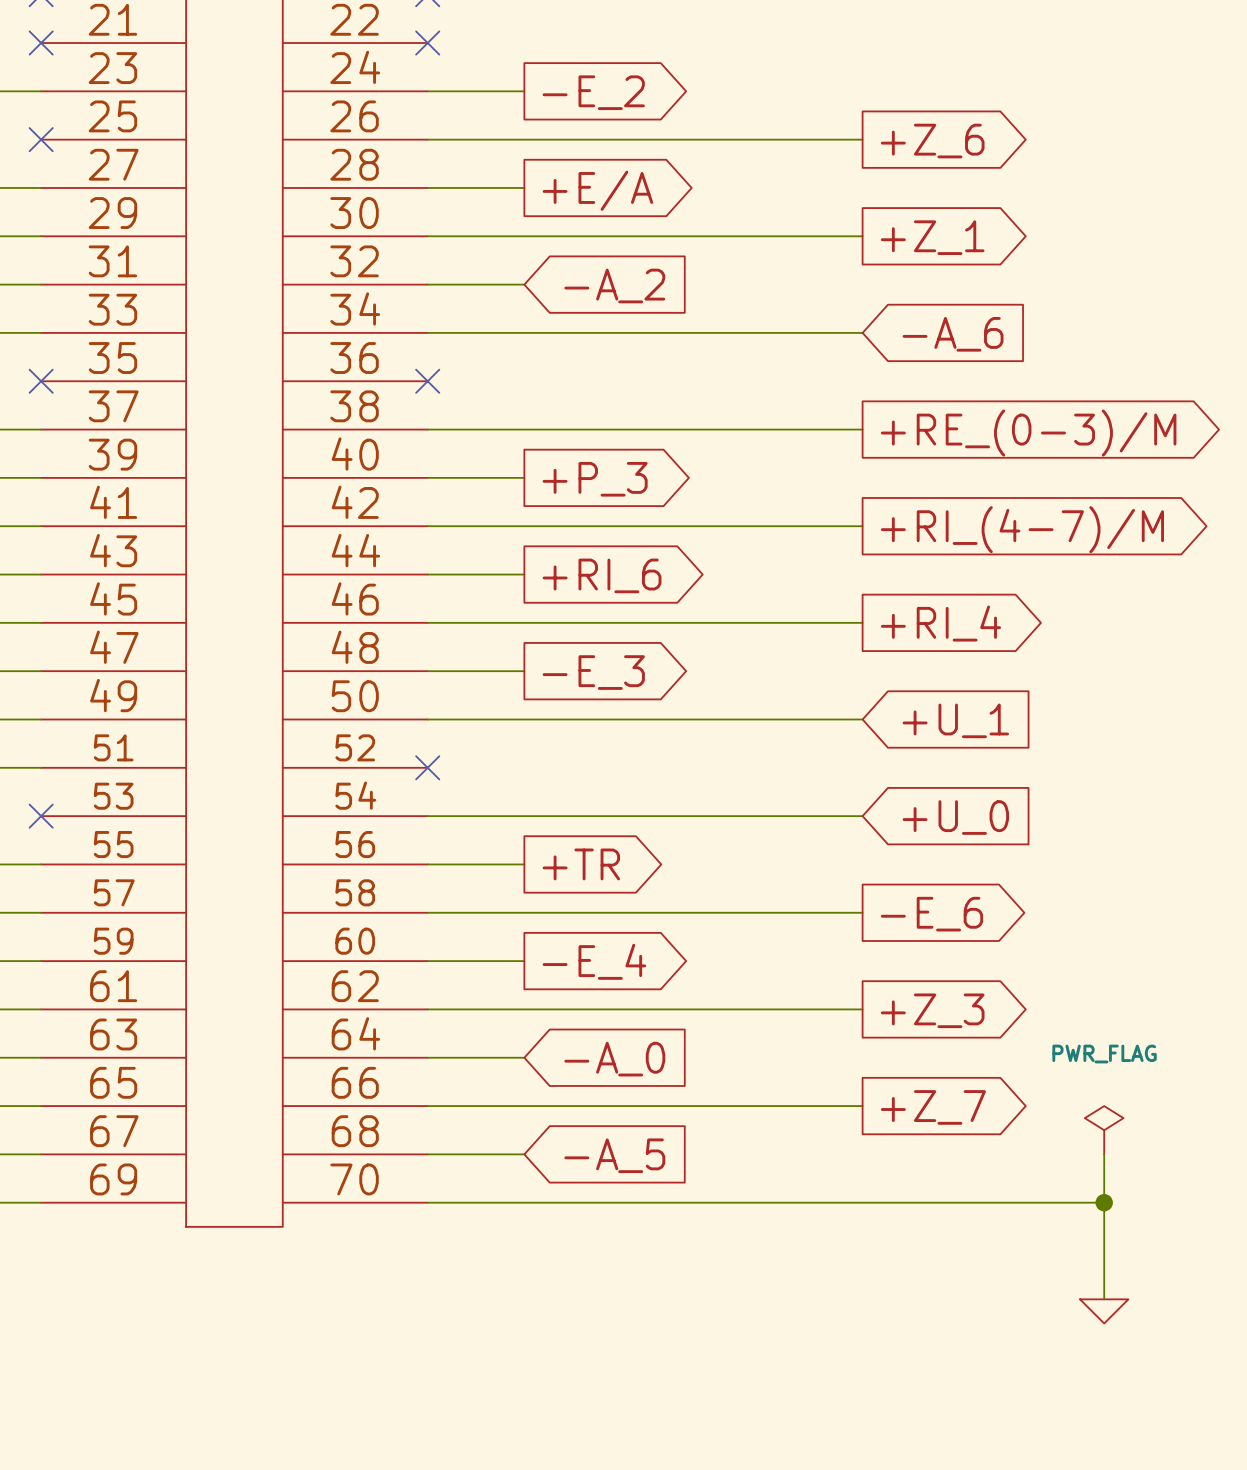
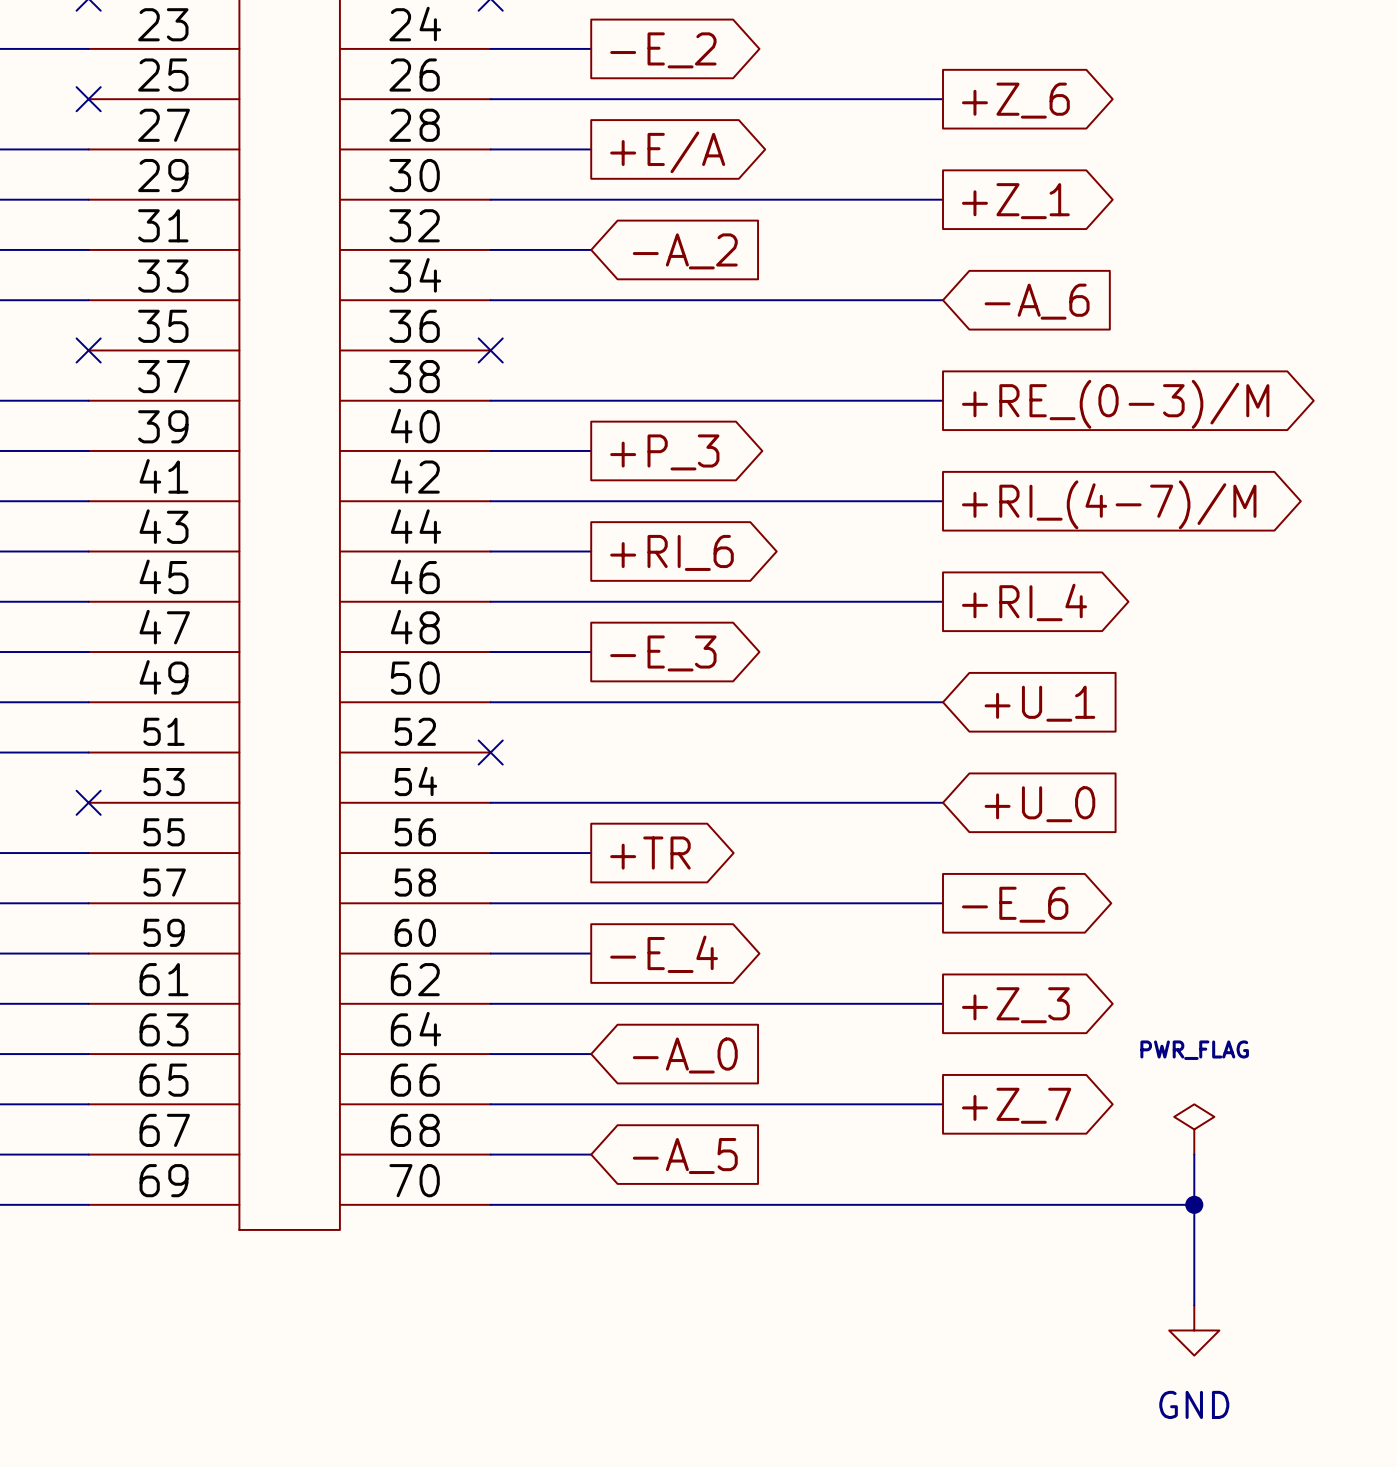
power symbol shape: [1080, 1299, 1129, 1324] -> [1169, 1305, 1220, 1356]
power symbol text: none -> GND (1194, 1404)

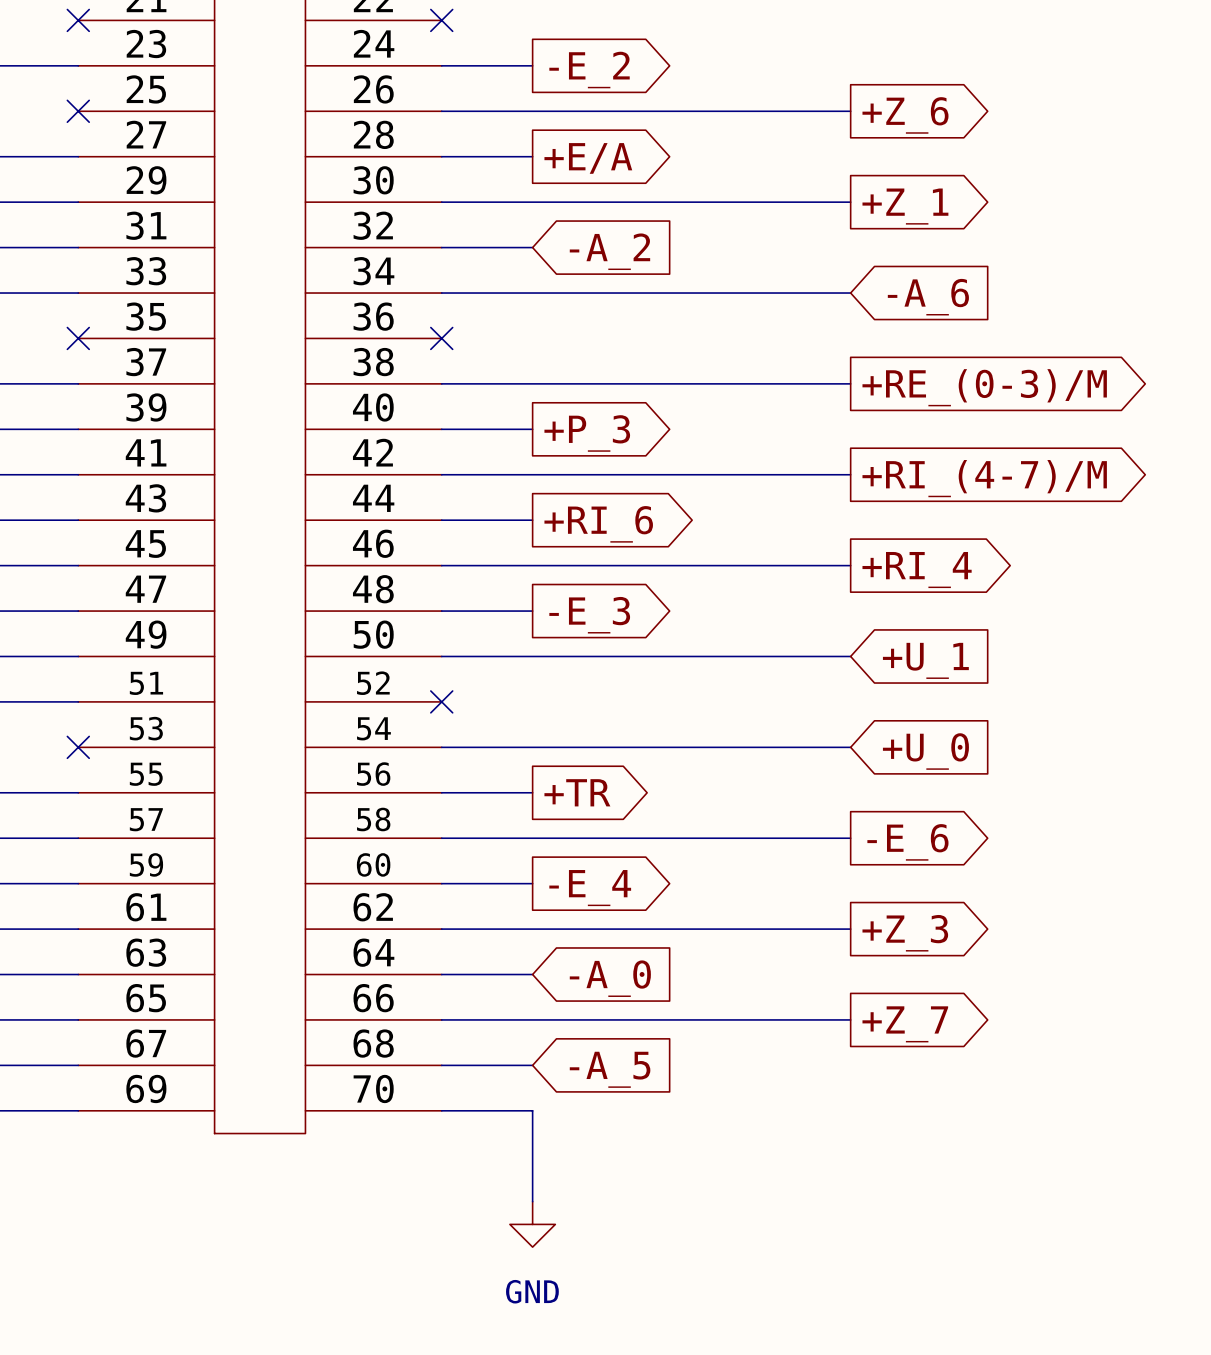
power symbol: PWR_FLAG (1194, 1129) -> none
wire: (1194, 1154) (1194, 1305) -> none
wire: (591, 1204) (1194, 1204) -> (532, 1110) (532, 1201)
junction: (1194, 1204) -> none
power symbol: none -> GND (532, 1224)
power symbol: GND (1194, 1330) -> none

